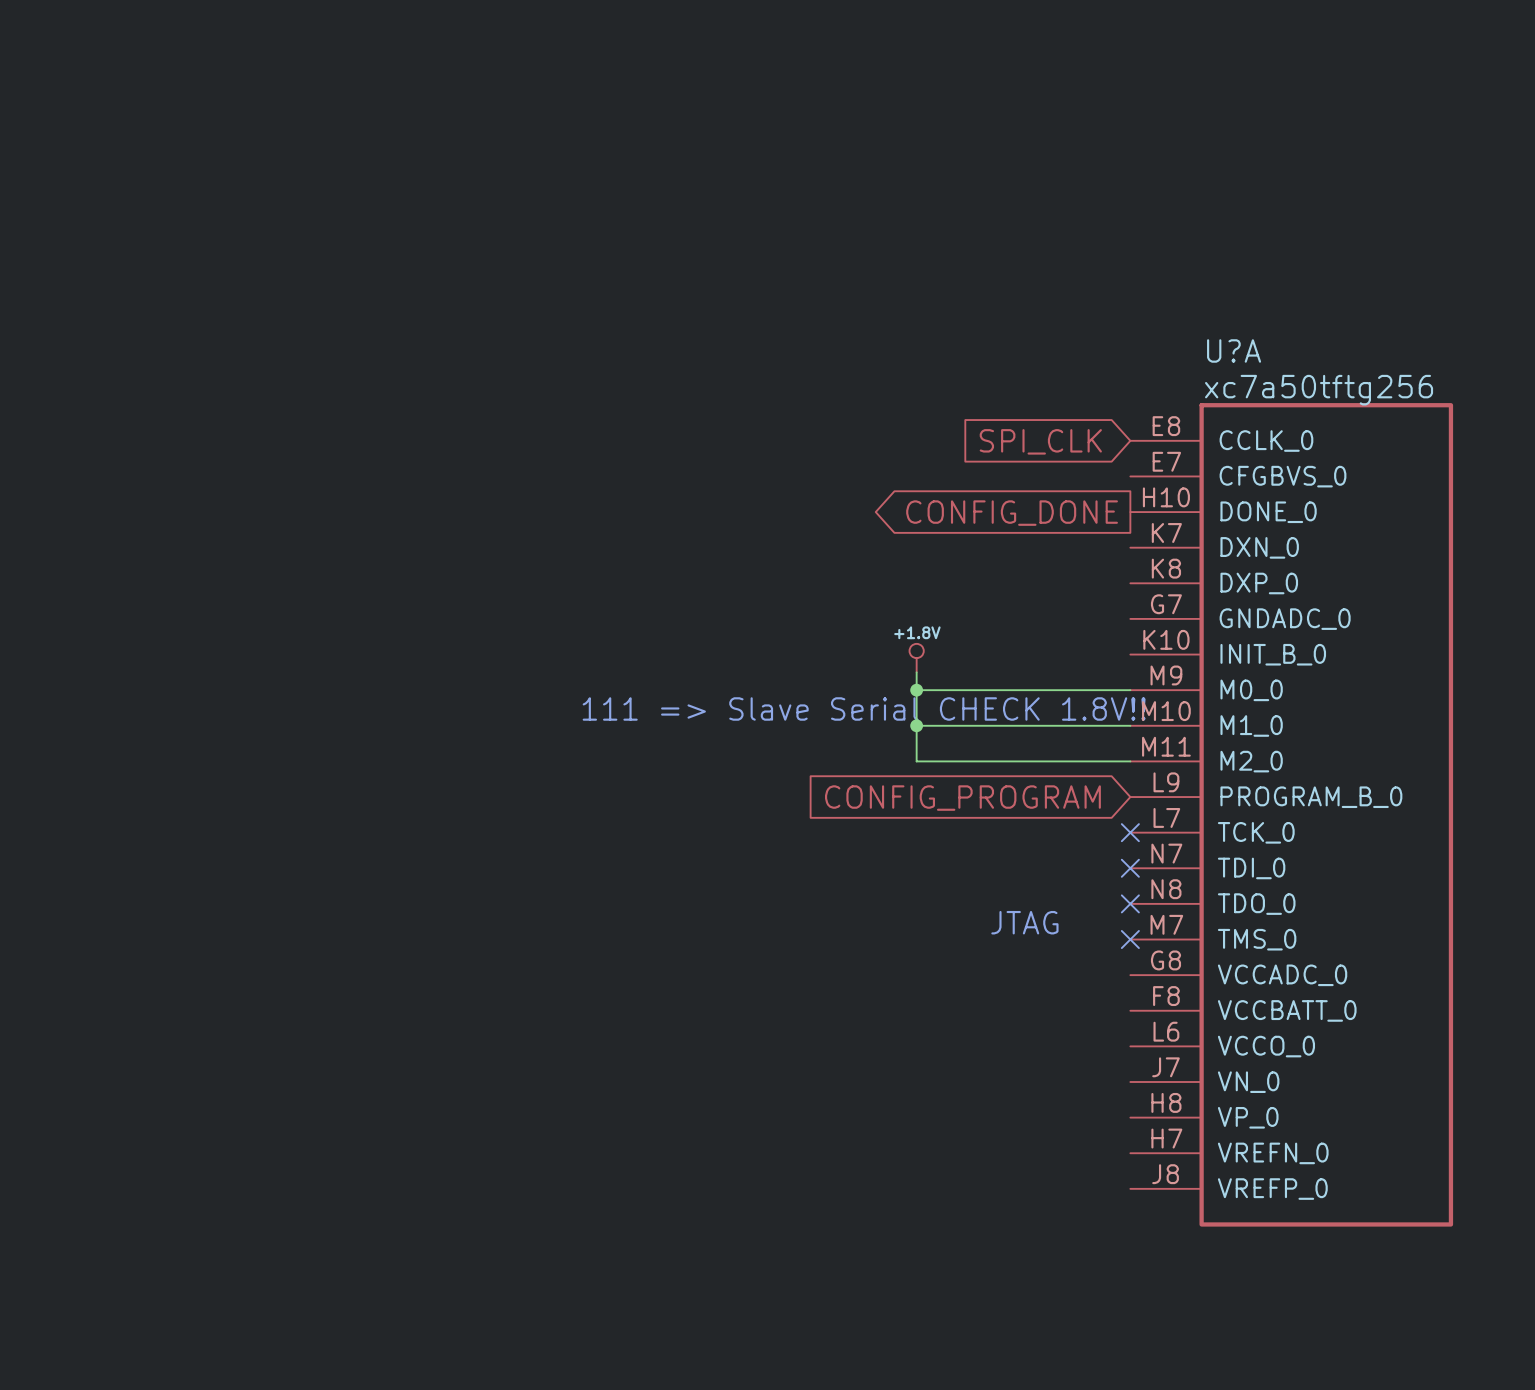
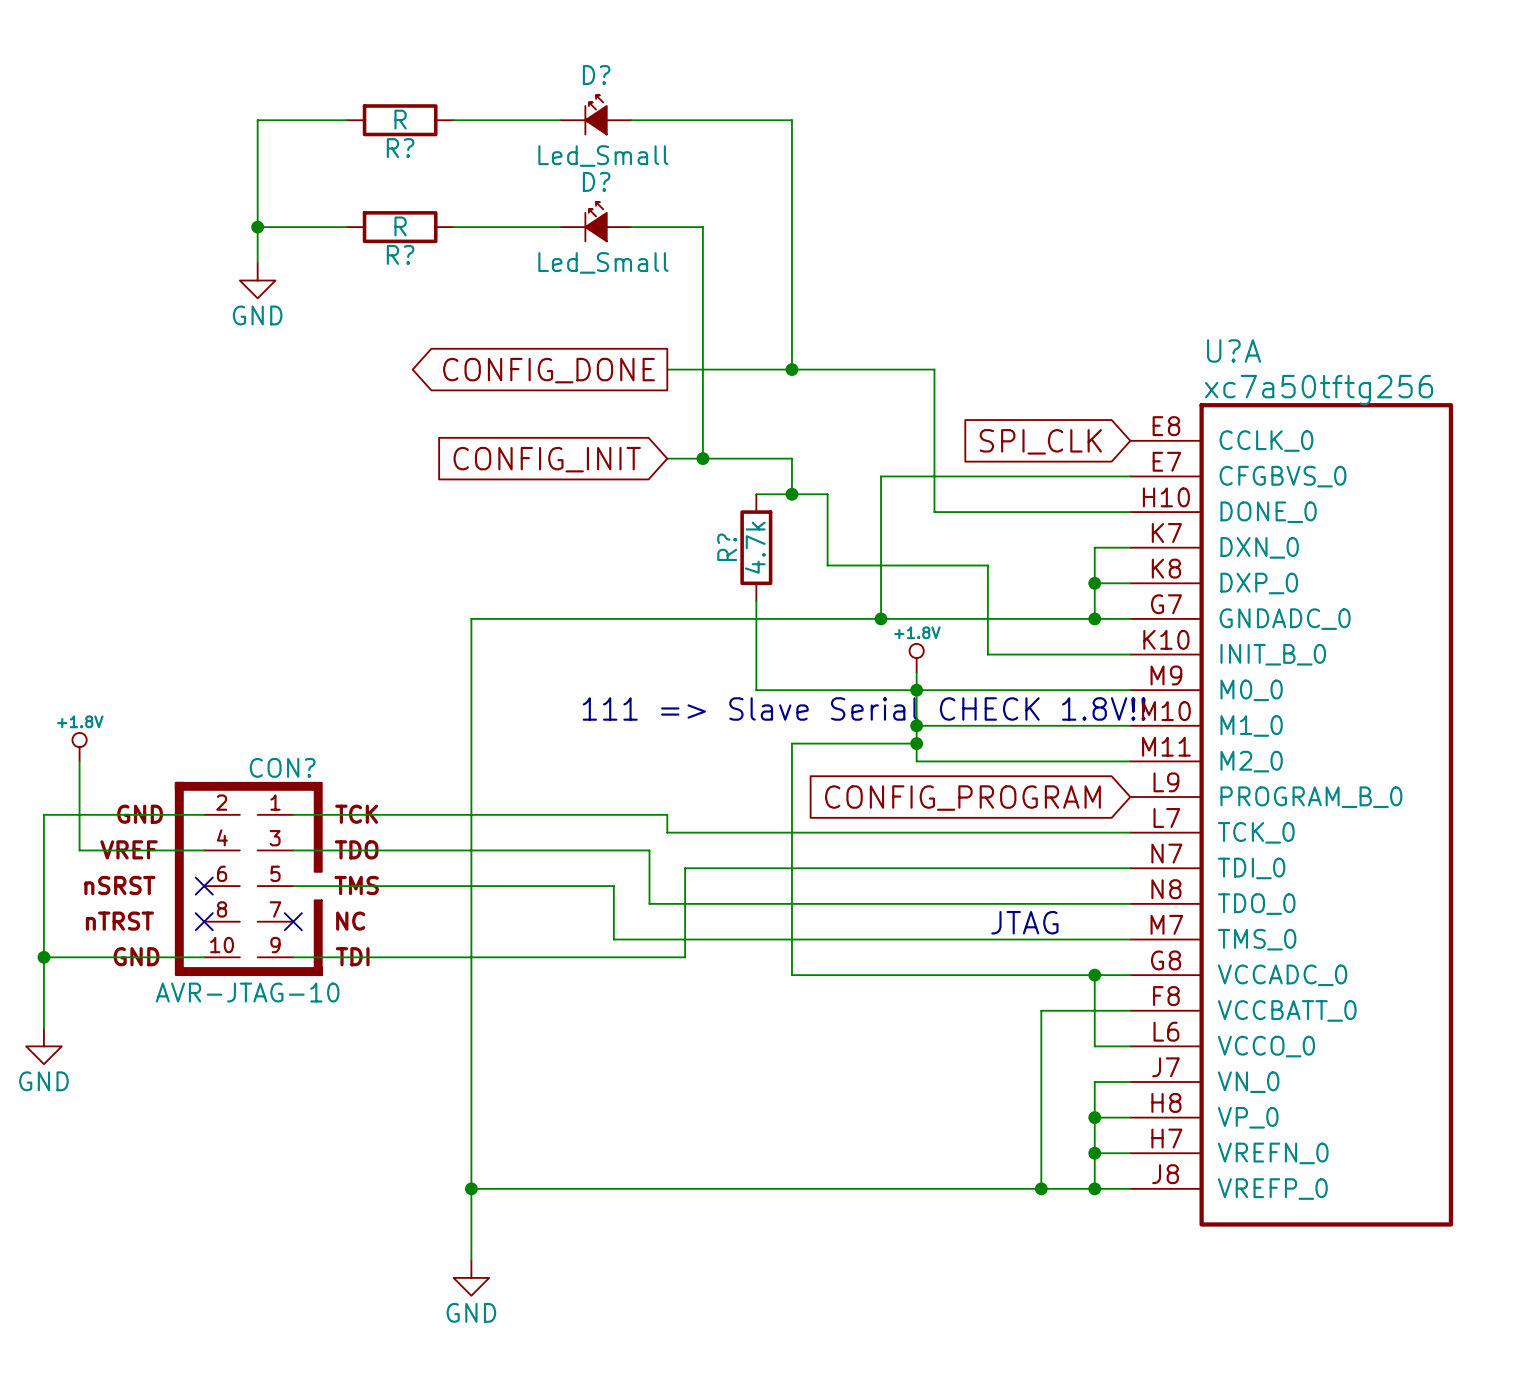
D?: none -> Led_Small (596, 114)
wire: none -> (346, 120) (257, 120) (257, 262)
R?: none -> R (400, 120)
wire: none -> (453, 120) (560, 120)
wire: none -> (631, 120) (791, 120) (791, 369)
D?: none -> Led_Small (596, 221)
wire: none -> (257, 227) (346, 227)
junction: none -> (257, 227)
R?: none -> R (400, 227)
wire: none -> (453, 227) (560, 227)
wire: none -> (631, 227) (702, 227) (702, 458)
power symbol: none -> GND (257, 280)
wire: none -> (667, 369) (934, 369) (934, 512) (1130, 512)
junction: none -> (791, 369)
global label: none -> CONFIG_DONE (548, 370)
wire: none -> (667, 458) (791, 458) (791, 494)
junction: none -> (702, 458)
global label: none -> CONFIG_INIT (547, 459)
wire: none -> (1130, 476) (881, 476) (881, 618)
wire: none -> (756, 494) (827, 494) (827, 565) (987, 565) (987, 654) (1130, 654)
junction: none -> (791, 494)
global label: CONFIG_DONE (1012, 513) -> none
R?: none -> 4.7k (756, 547)
wire: none -> (1130, 547) (1094, 547) (1094, 618)
wire: none -> (1094, 583) (1130, 583)
junction: none -> (1094, 583)
wire: none -> (756, 601) (756, 690) (916, 690)
junction: none -> (881, 618)
junction: none -> (1094, 618)
wire: none -> (1130, 618) (471, 618) (471, 1260)
wire: none -> (916, 743) (791, 743) (791, 975) (1130, 975)
junction: none -> (916, 743)
power symbol: none -> +1.8V (79, 747)
wire: none -> (79, 761) (79, 850) (204, 850)
wire: none -> (204, 814) (43, 814) (43, 1028)
wire: none -> (293, 814) (667, 814) (667, 832) (1130, 832)
no-connect mark: (1130, 832) -> none
wire: none -> (293, 850) (649, 850) (649, 903) (1130, 903)
wire: none -> (1130, 868) (685, 868) (685, 957) (293, 957)
no-connect mark: (1130, 868) -> none
CON?: none -> AVR-JTAG-10 (248, 878)
no-connect mark: none -> (204, 886)
wire: none -> (293, 886) (613, 886) (613, 939) (1130, 939)
no-connect mark: (1130, 903) -> none
no-connect mark: none -> (204, 921)
no-connect mark: none -> (293, 921)
no-connect mark: (1130, 939) -> none
wire: none -> (43, 957) (204, 957)
junction: none -> (43, 957)
wire: none -> (1094, 975) (1094, 1046) (1130, 1046)
junction: none -> (1094, 975)
wire: none -> (1130, 1010) (1041, 1010) (1041, 1188)
power symbol: none -> GND (43, 1046)
wire: none -> (1130, 1081) (1094, 1081) (1094, 1188)
wire: none -> (1094, 1117) (1130, 1117)
junction: none -> (1094, 1117)
wire: none -> (1094, 1153) (1130, 1153)
junction: none -> (1094, 1153)
wire: none -> (471, 1188) (1130, 1188)
junction: none -> (471, 1188)
junction: none -> (1041, 1188)
junction: none -> (1094, 1188)
power symbol: none -> GND (471, 1277)

